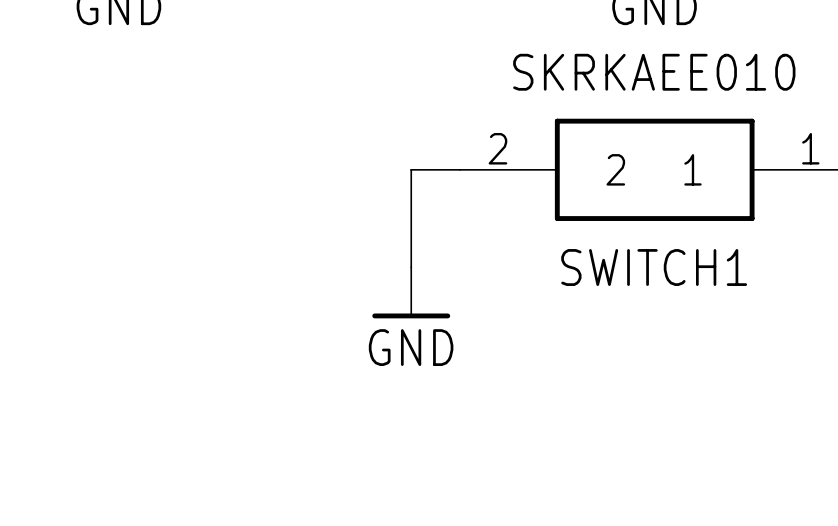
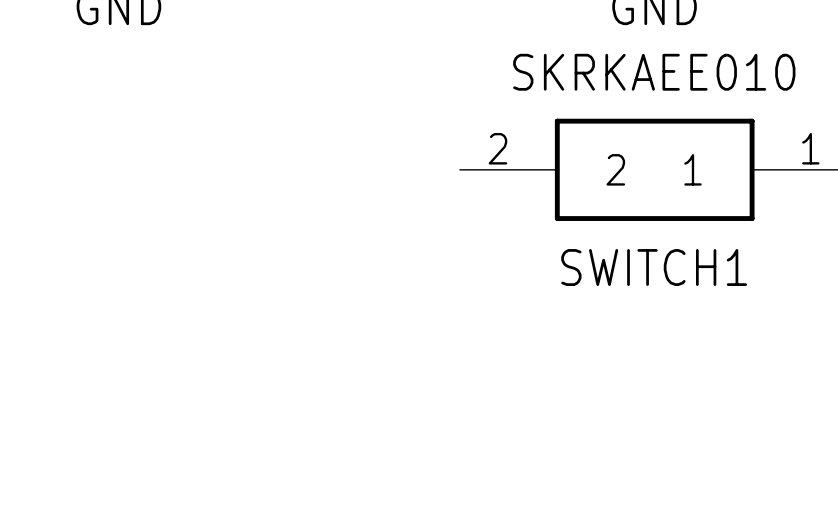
wire: (459, 169) (411, 169) (411, 267) -> none
power symbol: GND (411, 292) -> none

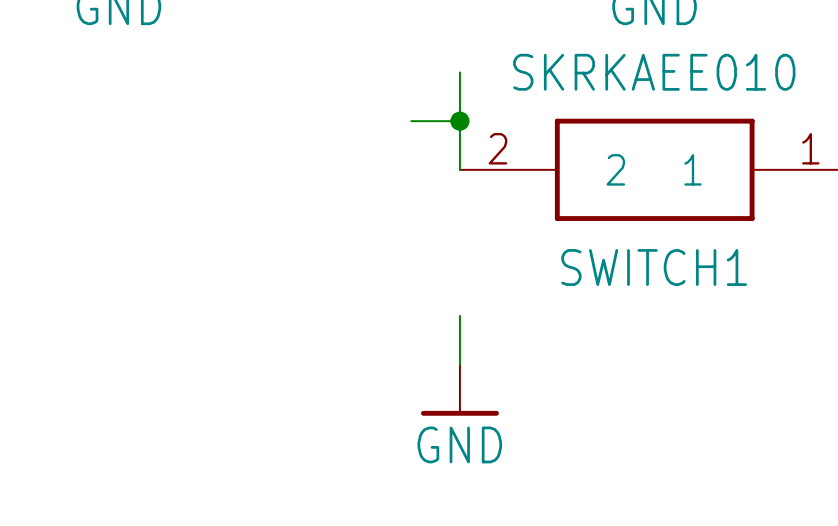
wire: none -> (459, 72) (459, 169)
wire: none -> (411, 121) (459, 121)
junction: none -> (459, 121)
wire: none -> (459, 315) (459, 364)
power symbol: none -> GND (459, 390)

